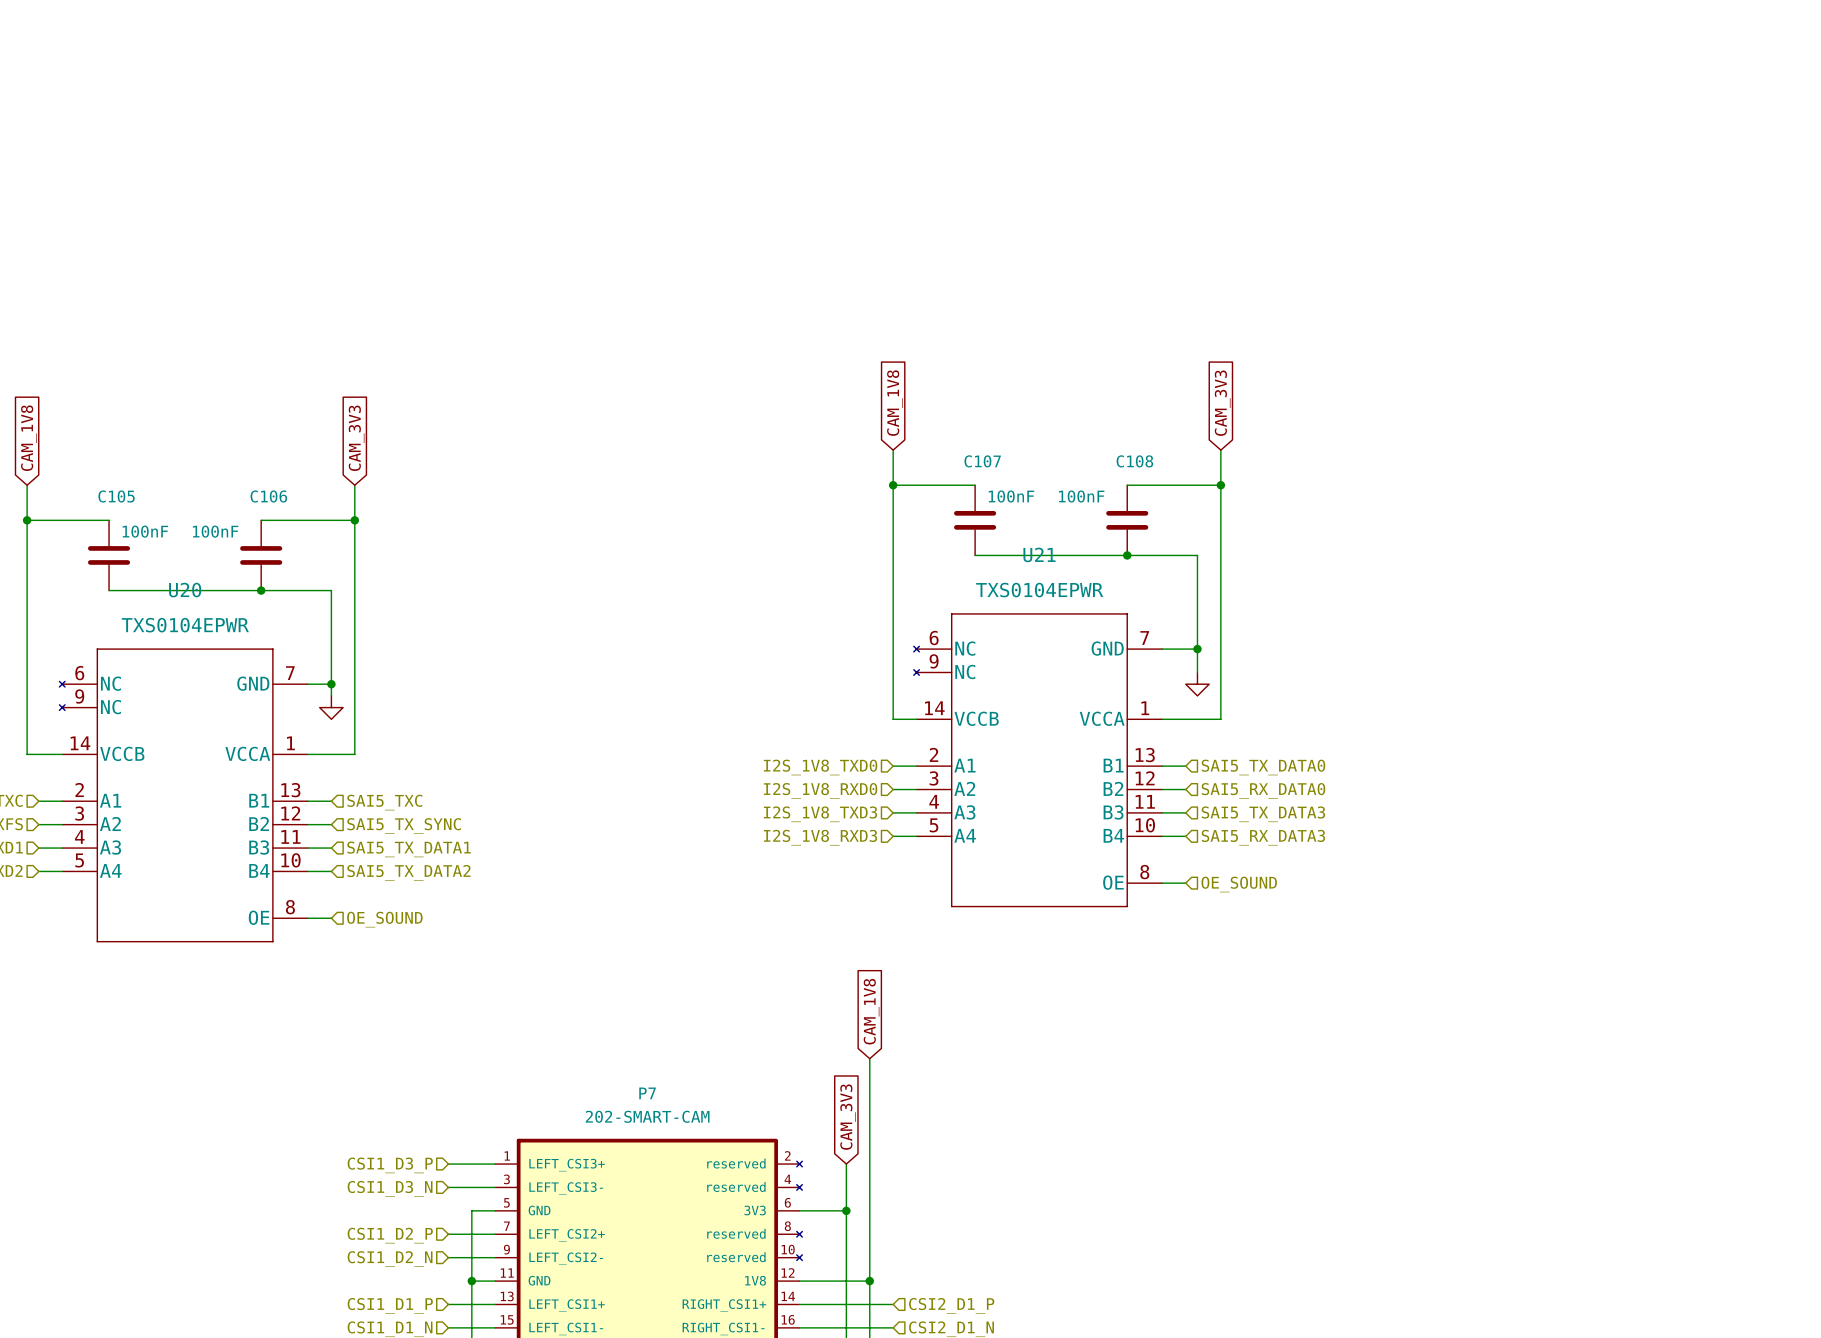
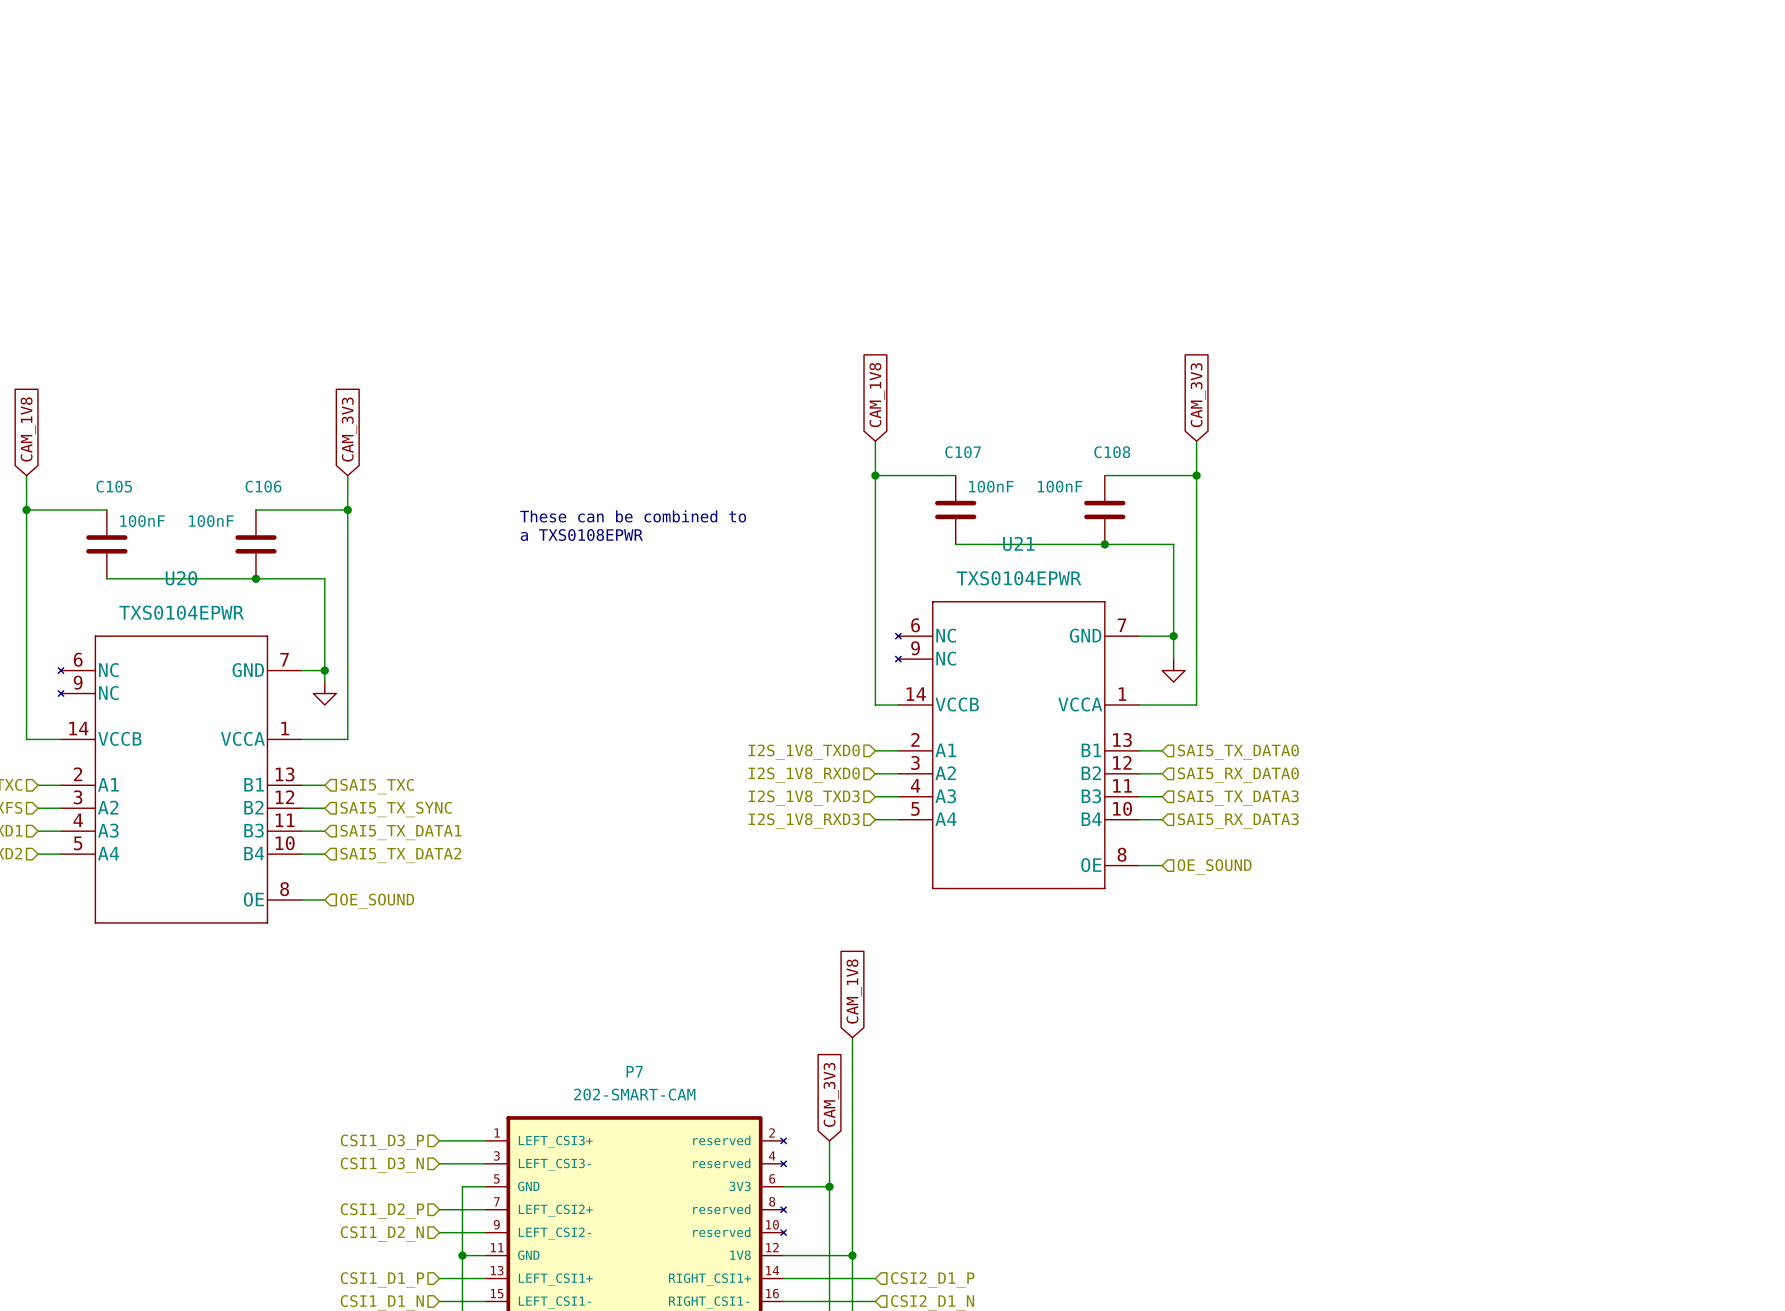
text: none -> These can be combined to (633, 516)
text: none -> a TXS0108EPWR (581, 535)

